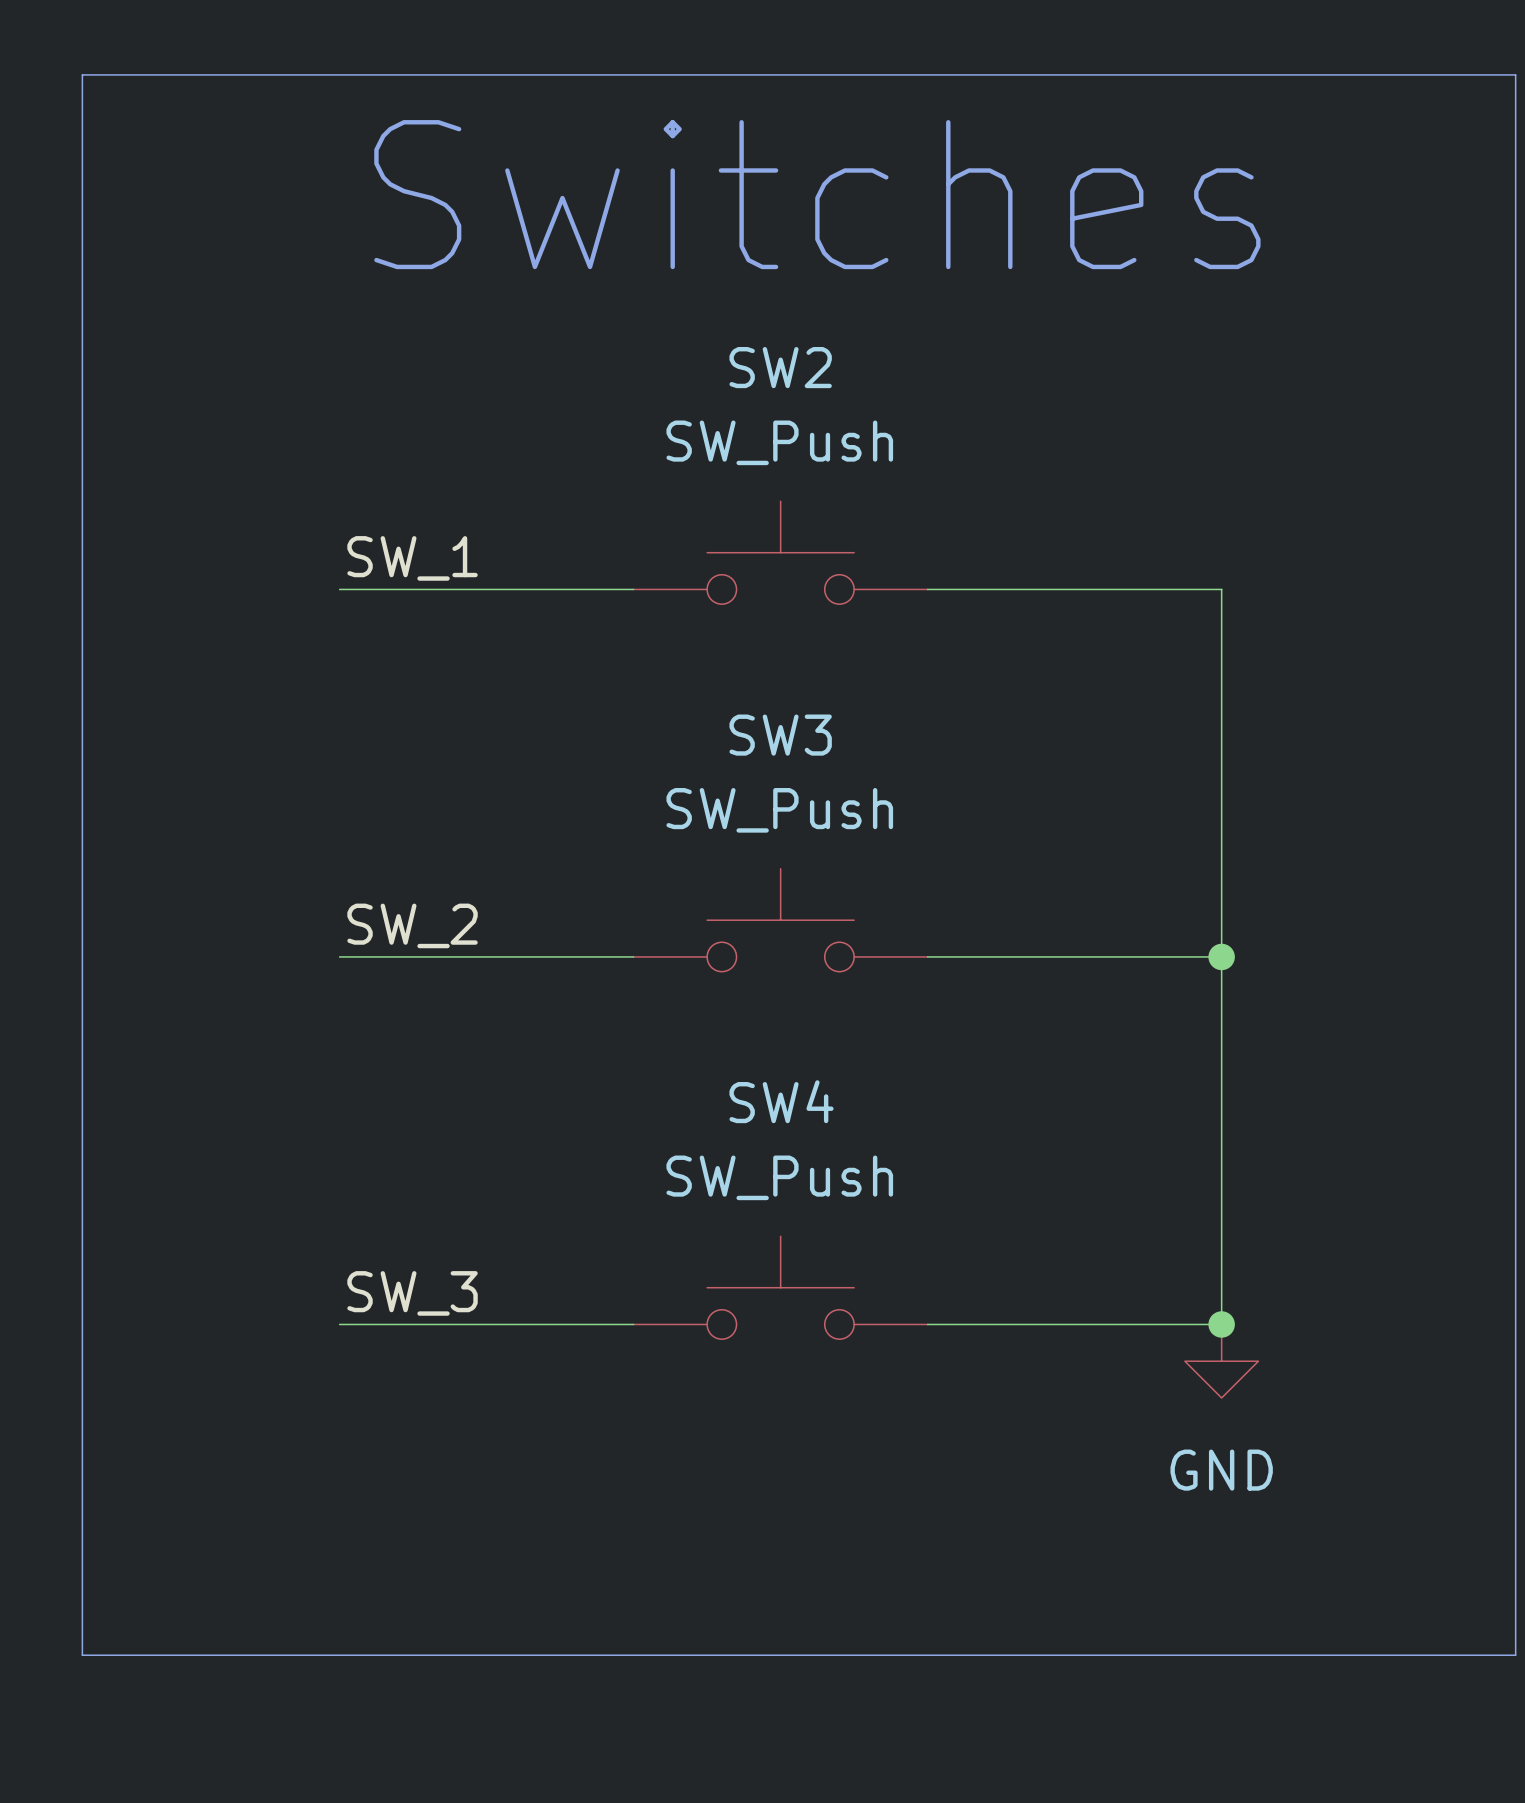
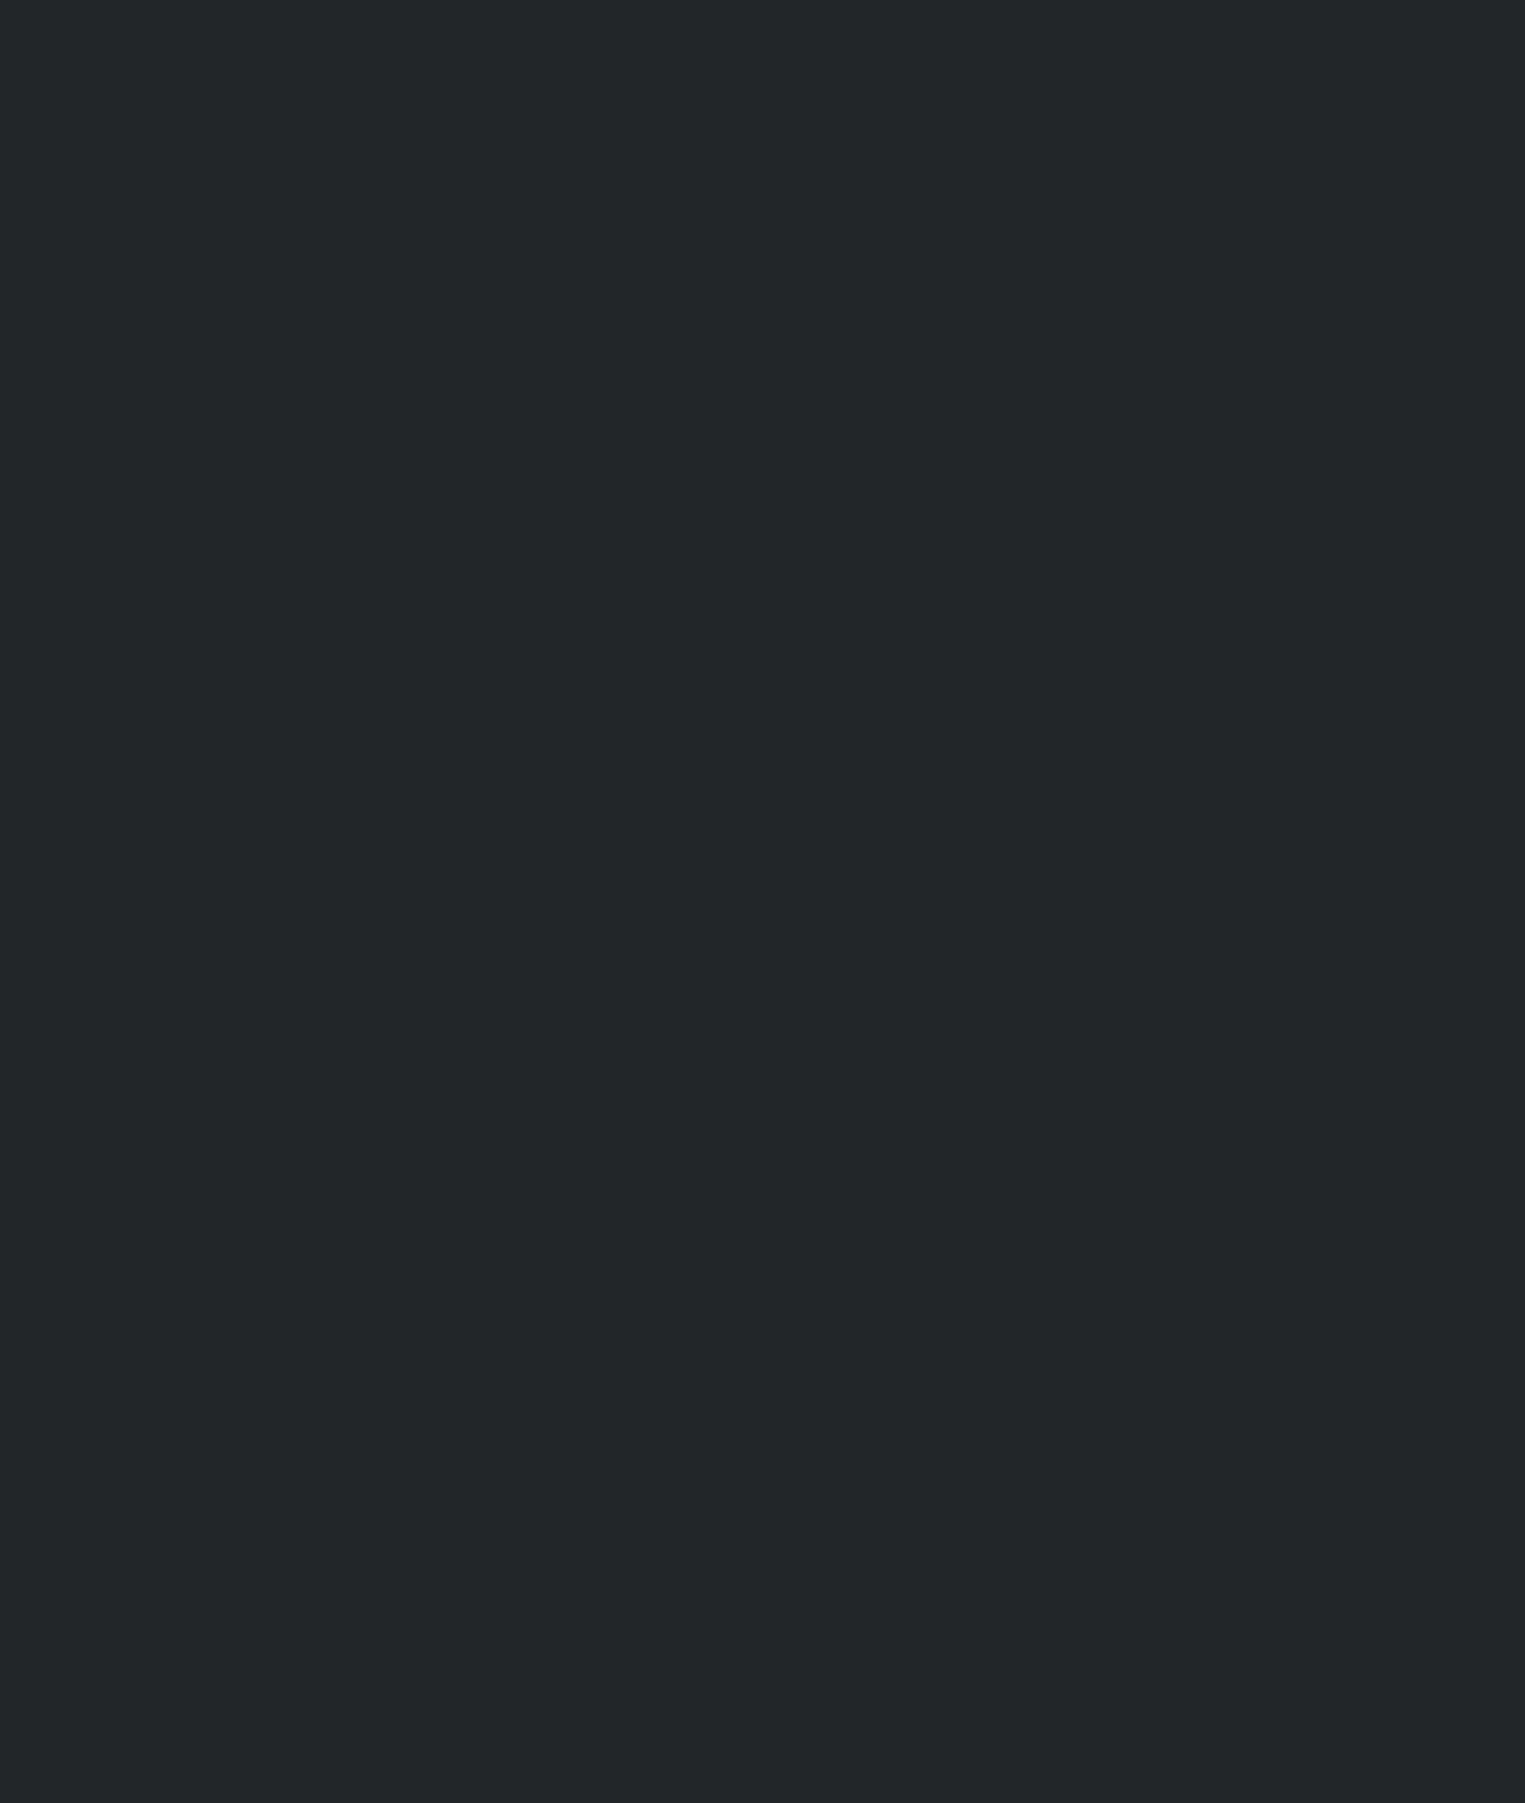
line: (82, 74) (82, 1655) (1515, 1655) (1515, 74) (82, 74) -> none
text: Switches (817, 194) -> none
SW2: SW_Push (780, 552) -> none
label: SW_1 (412, 558) -> none
wire: (339, 589) (633, 589) -> none
wire: (927, 589) (1221, 589) (1221, 1324) (927, 1324) -> none
SW3: SW_Push (780, 920) -> none
label: SW_2 (412, 925) -> none
wire: (339, 956) (633, 956) -> none
wire: (927, 956) (1221, 956) -> none
junction: (1221, 956) -> none
SW4: SW_Push (780, 1287) -> none
label: SW_3 (412, 1293) -> none
wire: (339, 1324) (633, 1324) -> none
junction: (1221, 1324) -> none
power symbol: GND (1221, 1361) -> none

